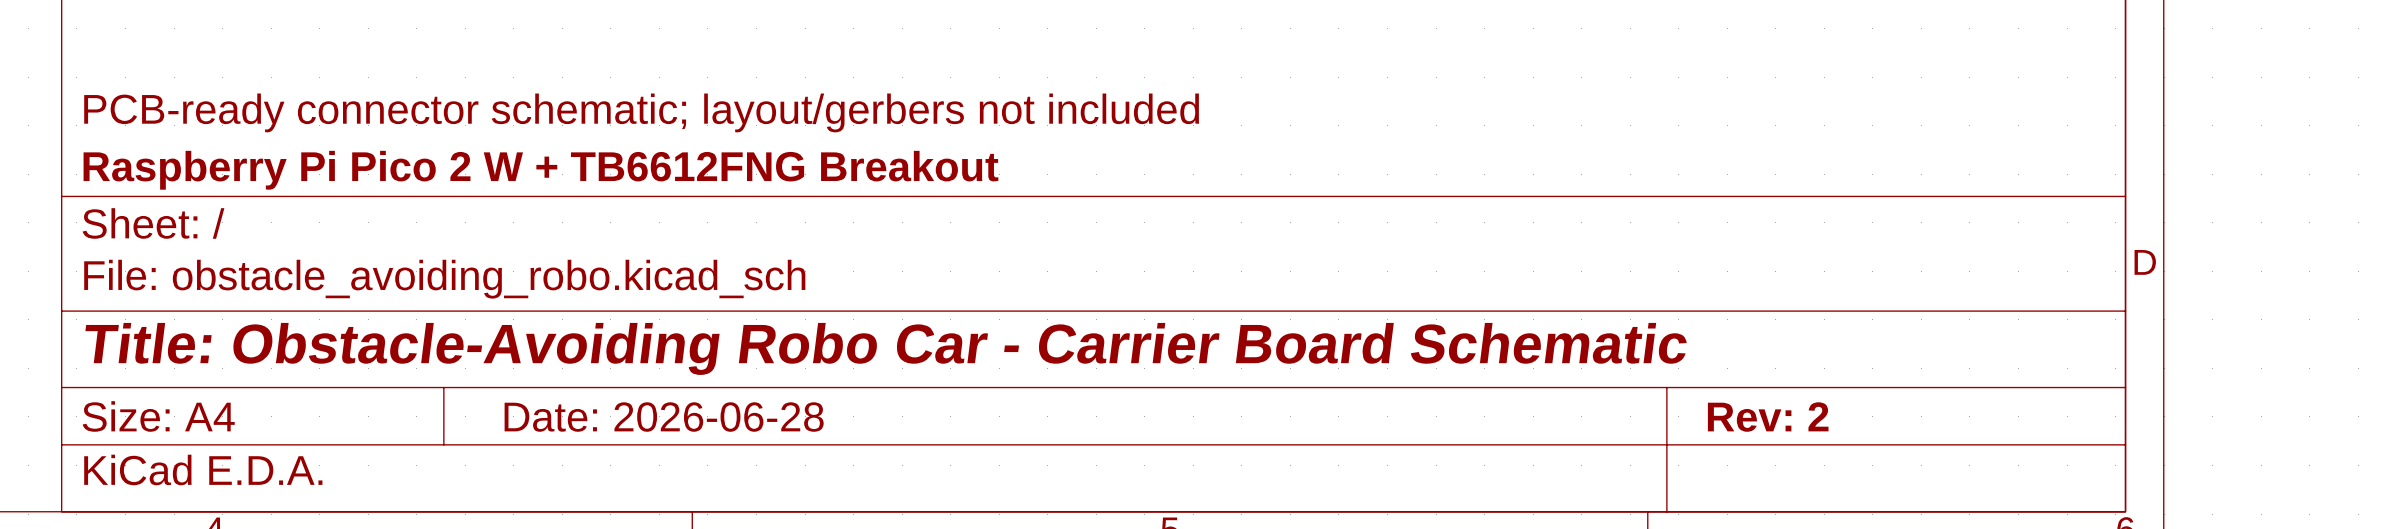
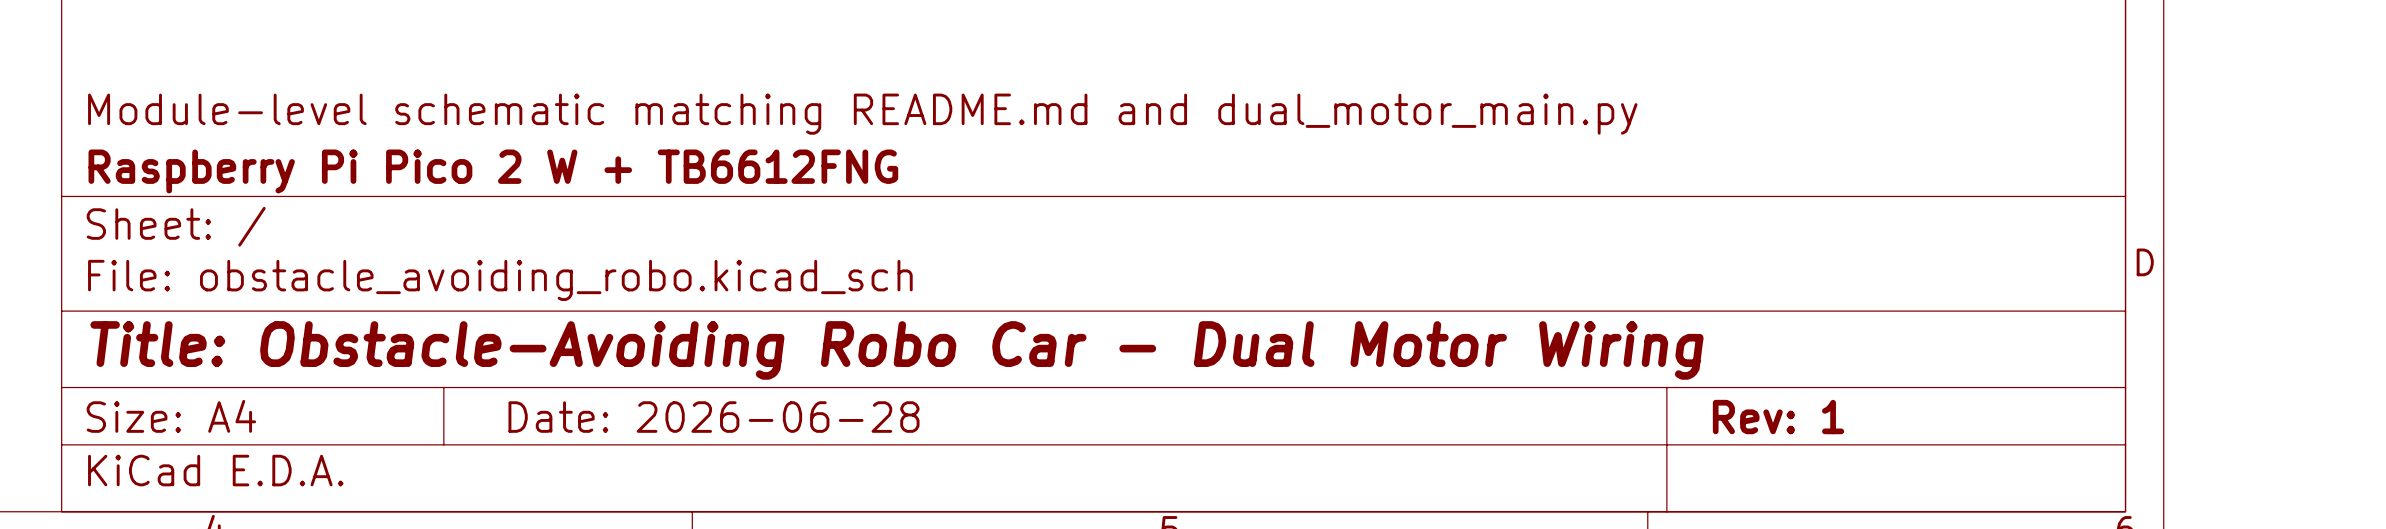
title block: PCB-ready connector schematic; layout/gerbers not included (641, 112) -> Module-level schematic matching README.md and dual_motor_main.py (862, 114)
title block: Raspberry Pi Pico 2 W + TB6612FNG Breakout (540, 170) -> Raspberry Pi Pico 2 W + TB6612FNG (493, 171)
title block: Title: Obstacle-Avoiding Robo Car - Carrier Board Schematic (886, 348) -> Title: Obstacle-Avoiding Robo Car - Dual Motor Wiring (896, 350)
title block: Rev: 2 (1768, 417) -> Rev: 1 (1778, 417)

